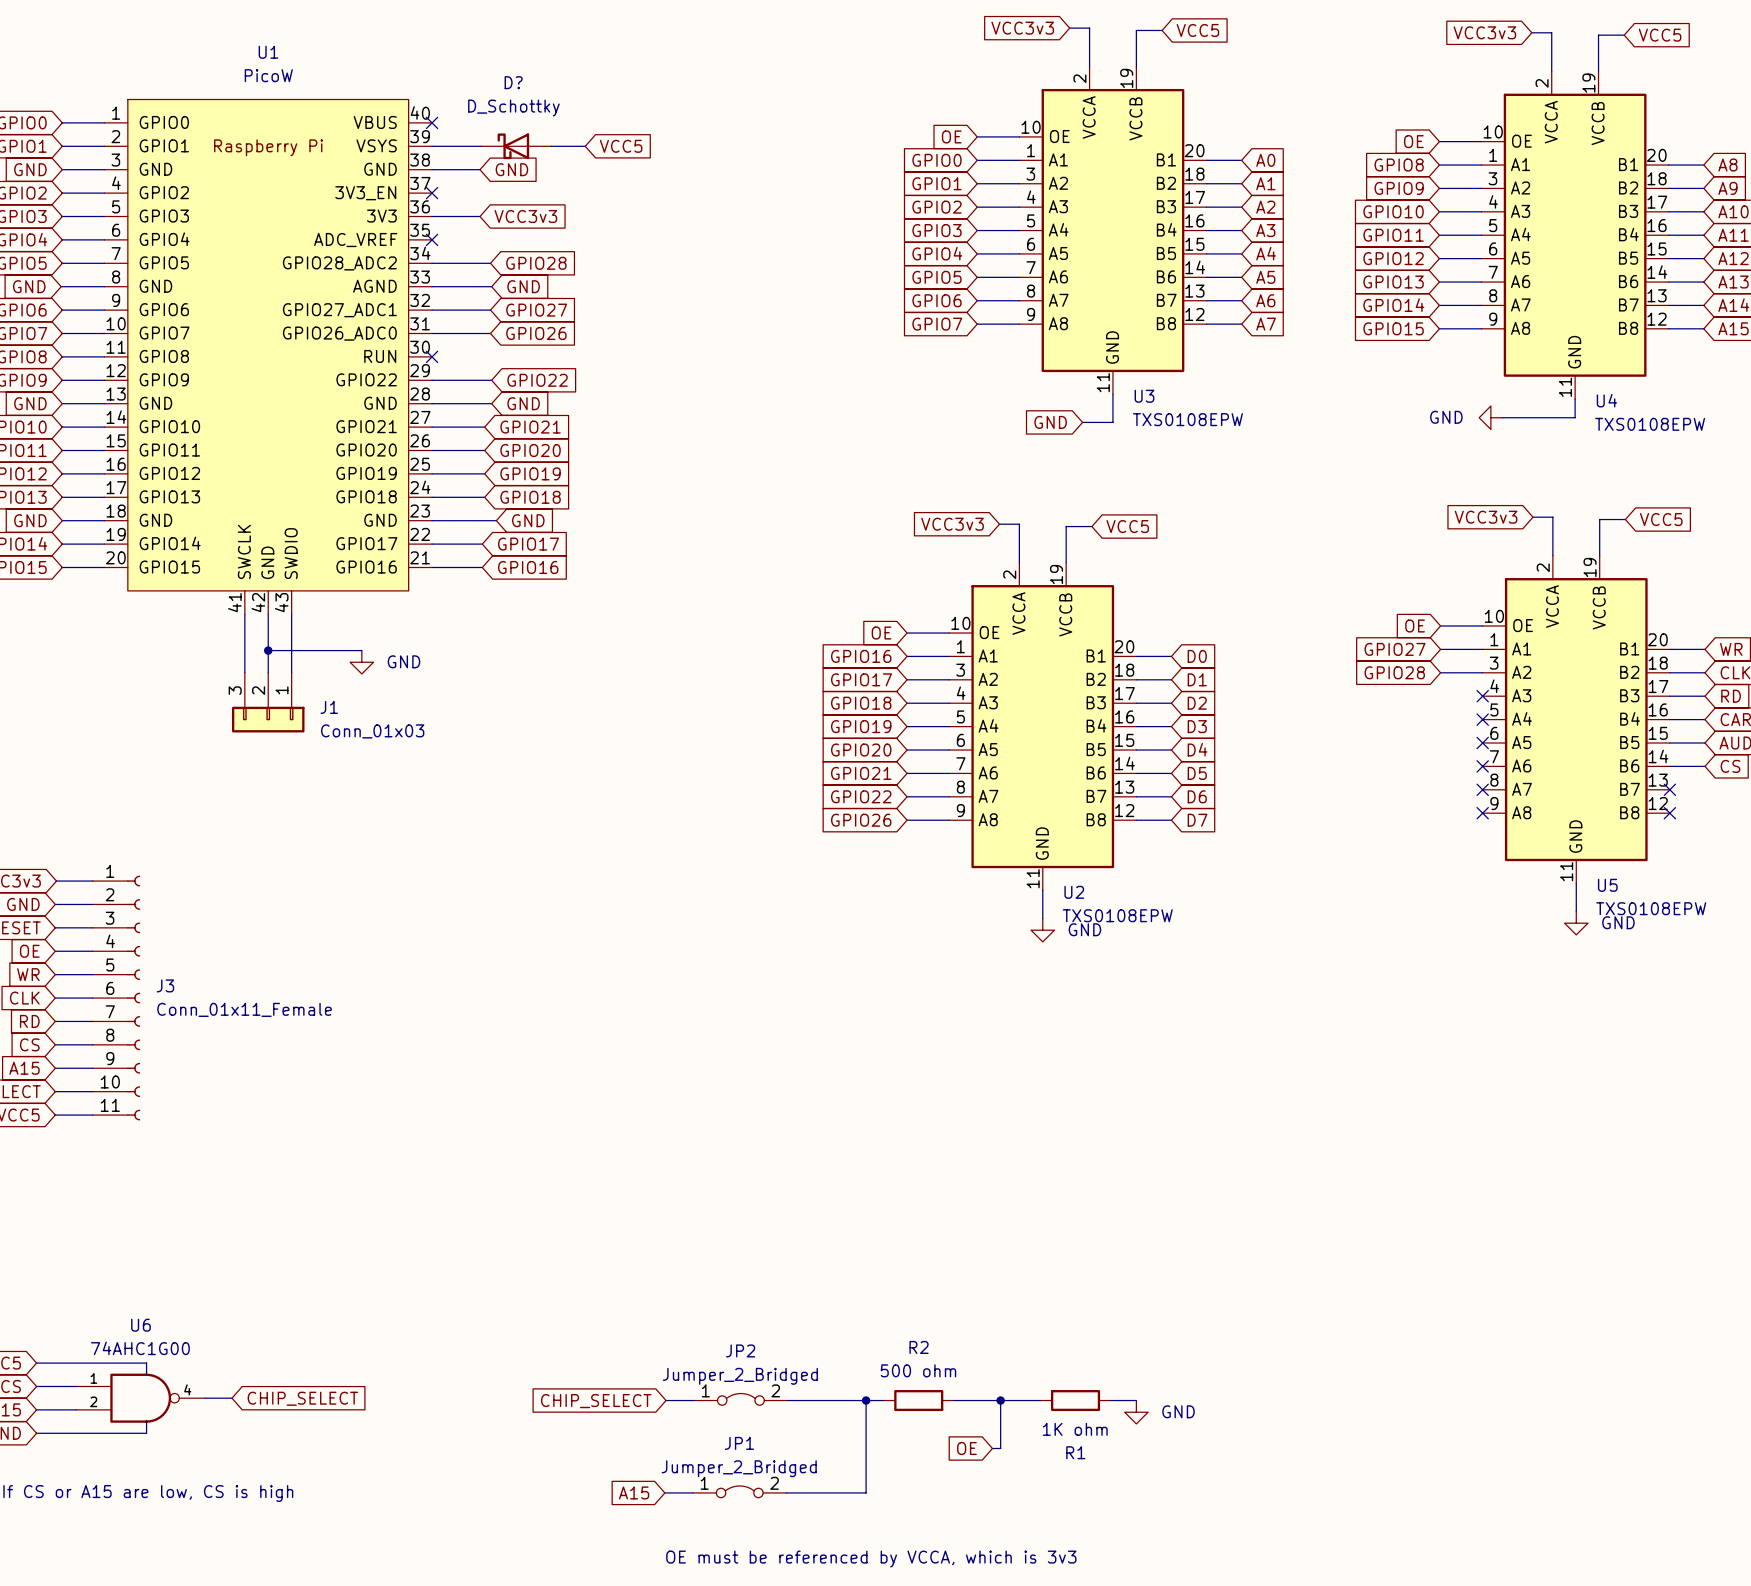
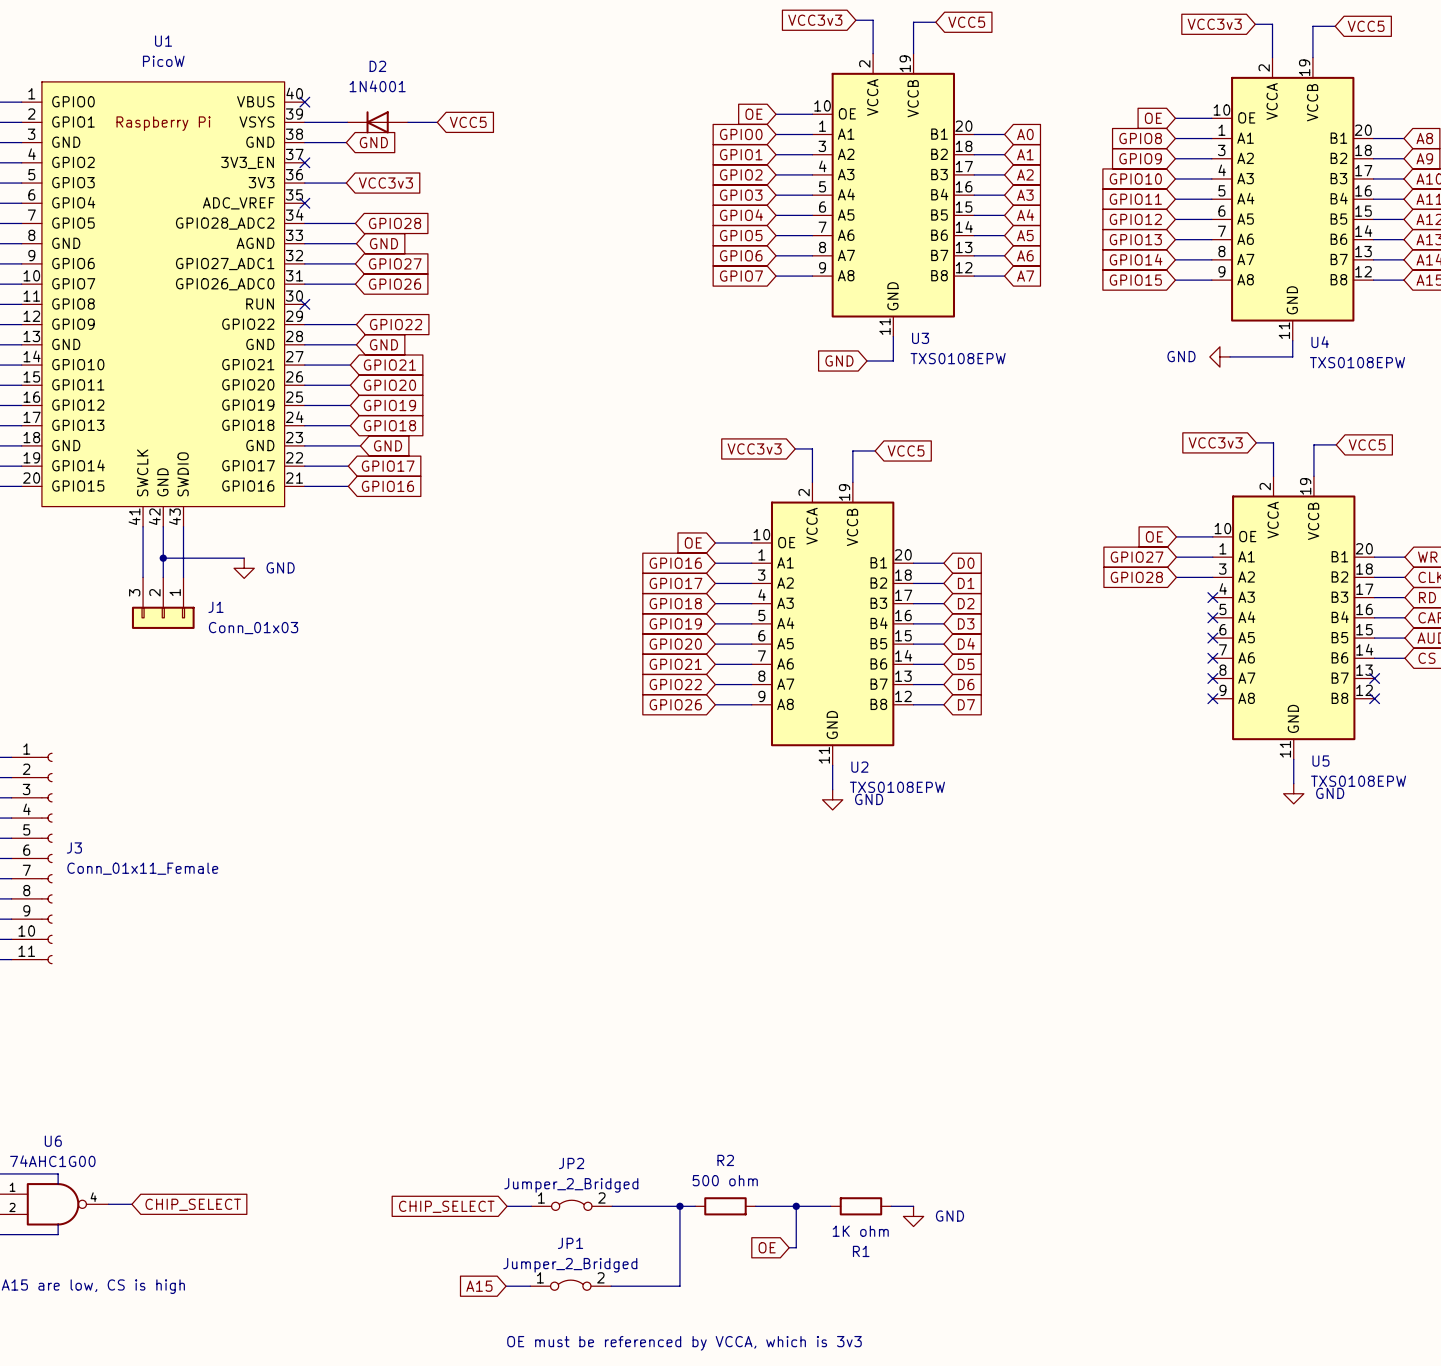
D?: D_Schottky (516, 146) -> none
D2: none -> 1N4001 (377, 122)

